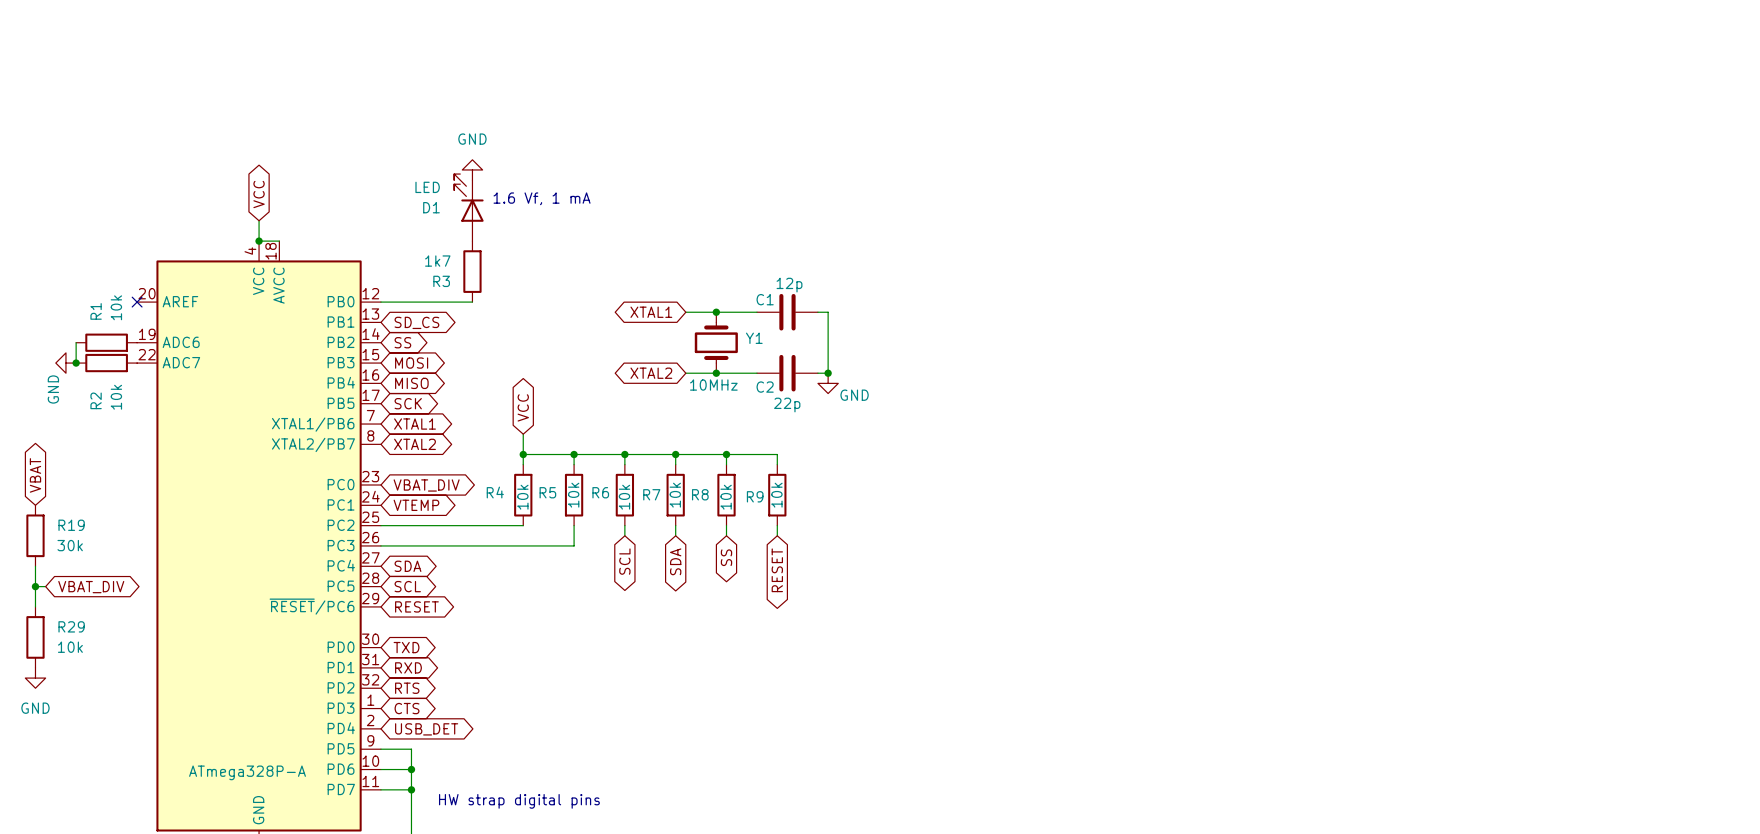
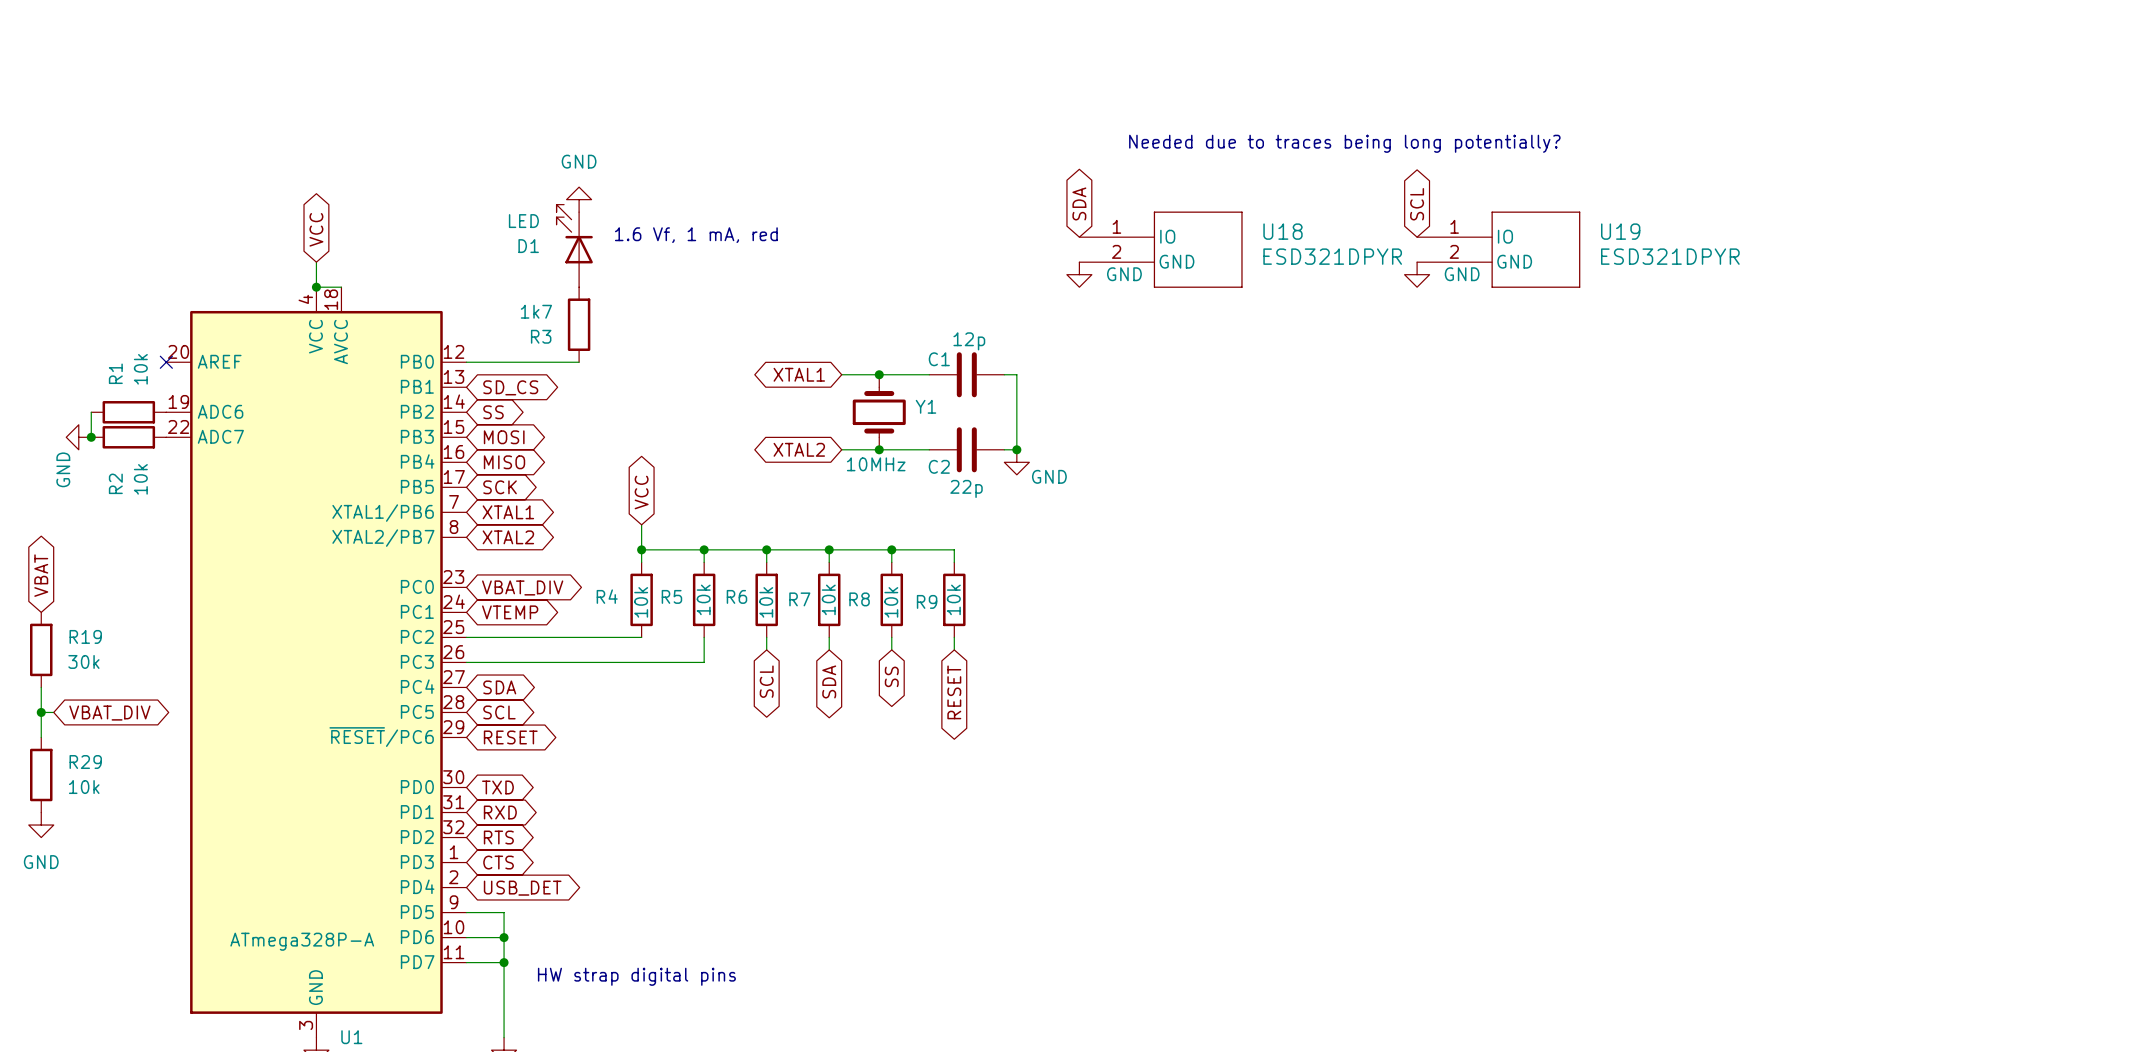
text: none -> Needed due to traces being long potentially? (1344, 143)
global label: none -> SDA (1079, 203)
global label: none -> SCL (1417, 204)
text: 1.6 Vf, 1 mA (542, 198) -> 1.6 Vf, 1 mA, red (696, 235)
U18: none -> ESD321DPYR (1160, 249)
U19: none -> ESD321DPYR (1498, 249)
power symbol: none -> GND (1079, 274)
power symbol: none -> GND (1417, 274)

